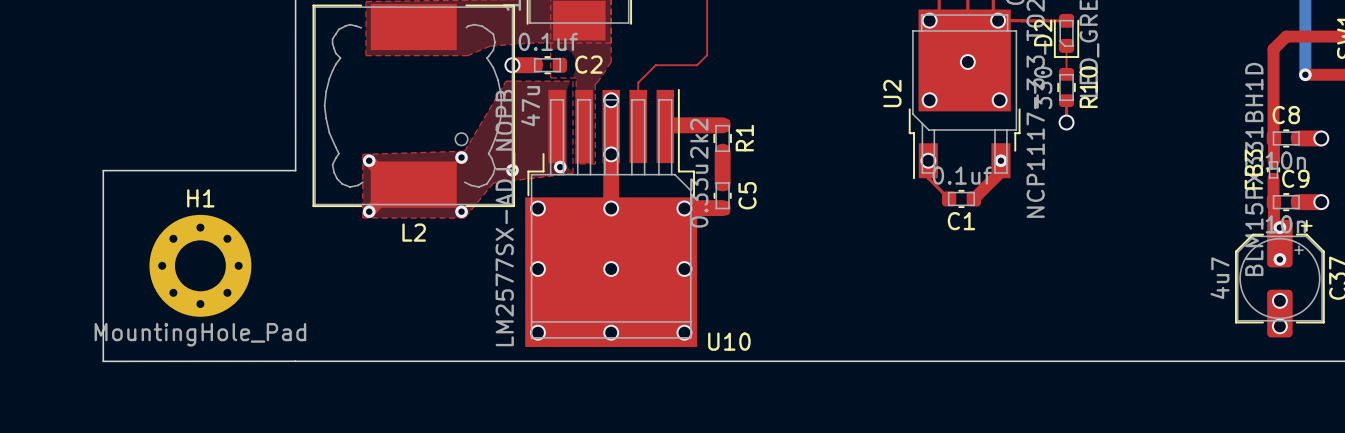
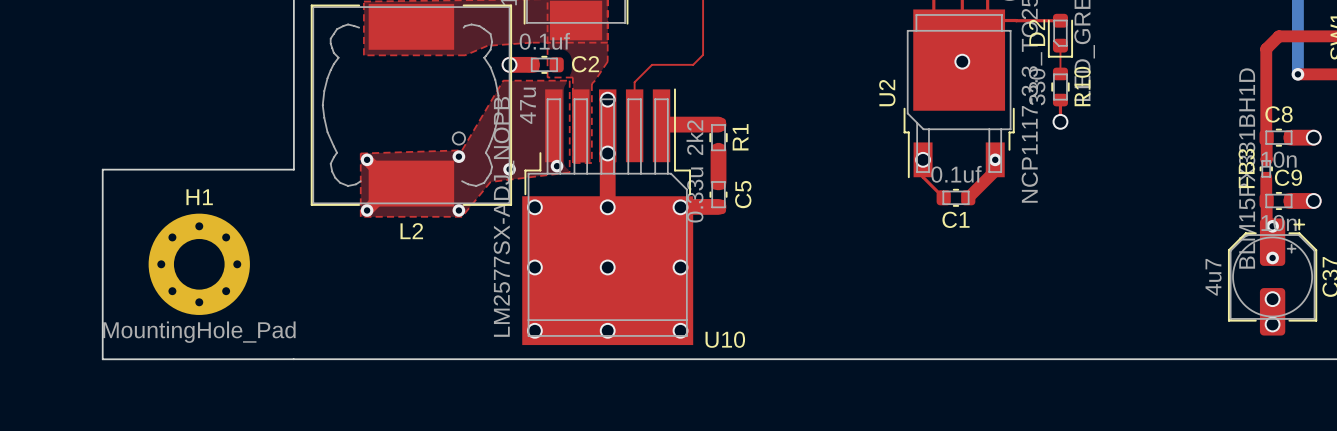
via: (929, 20) -> none
via: (998, 20) -> none
via: (929, 100) -> none
via: (999, 100) -> none

